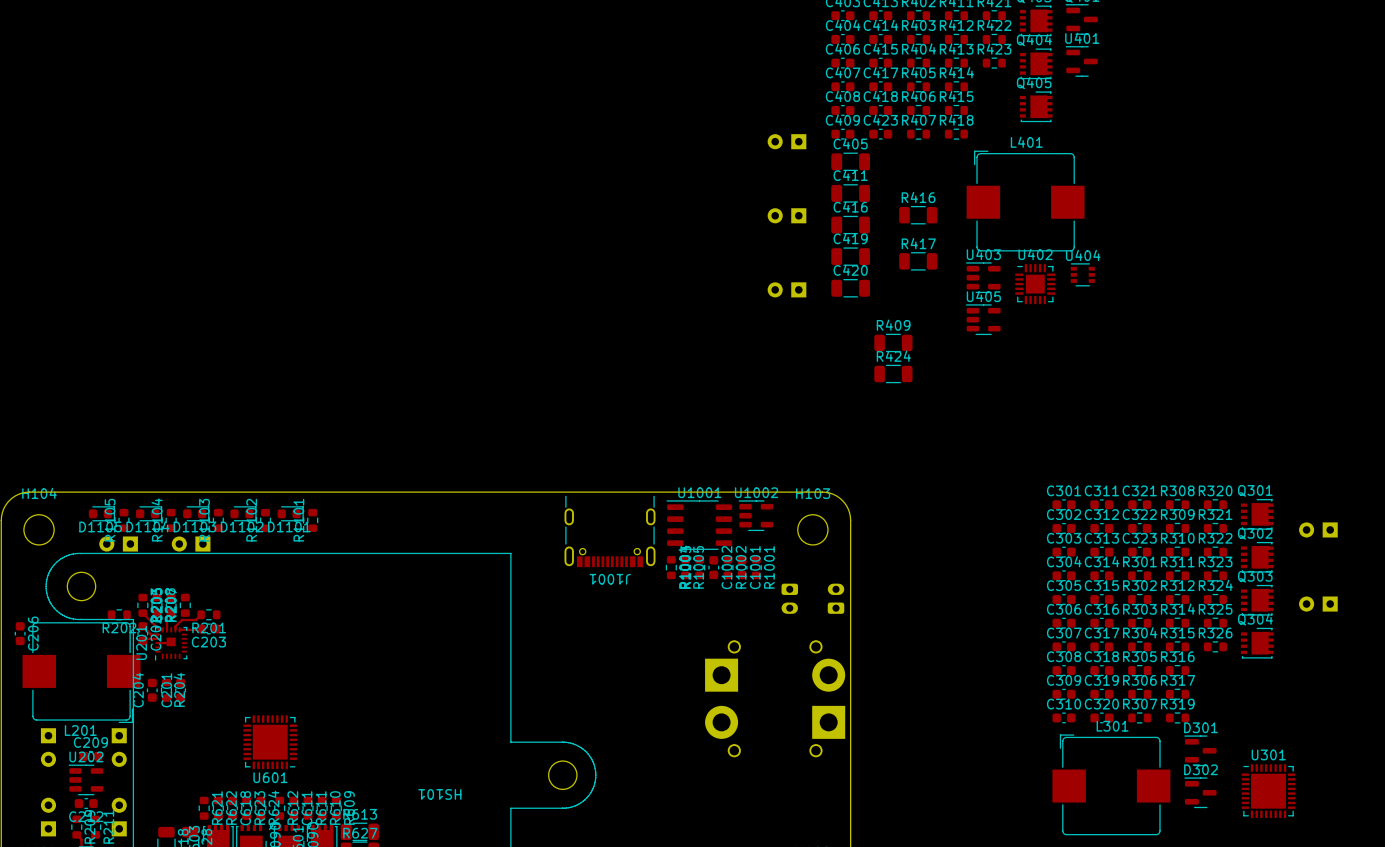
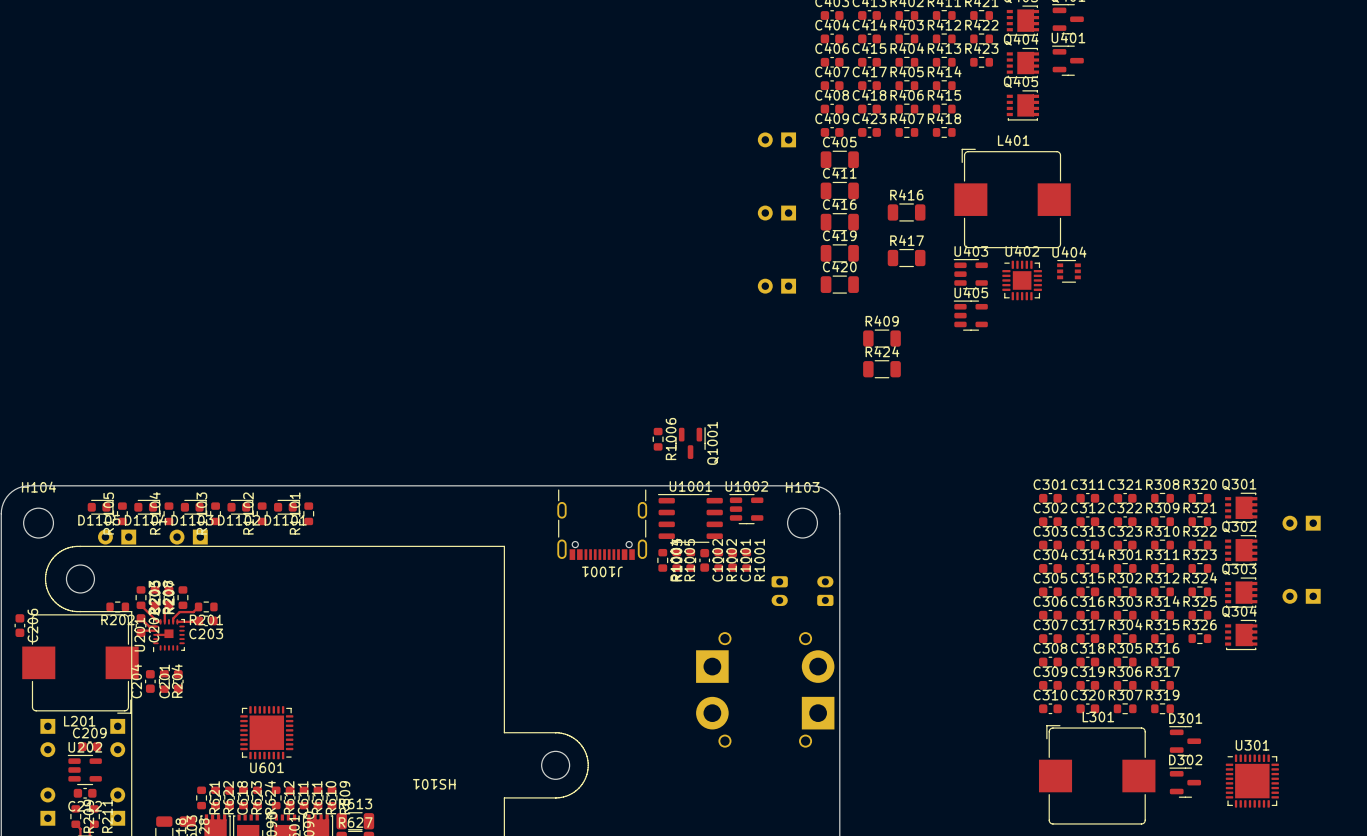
R1006: none -> (658, 439)
Q1001: none -> (690, 443)

